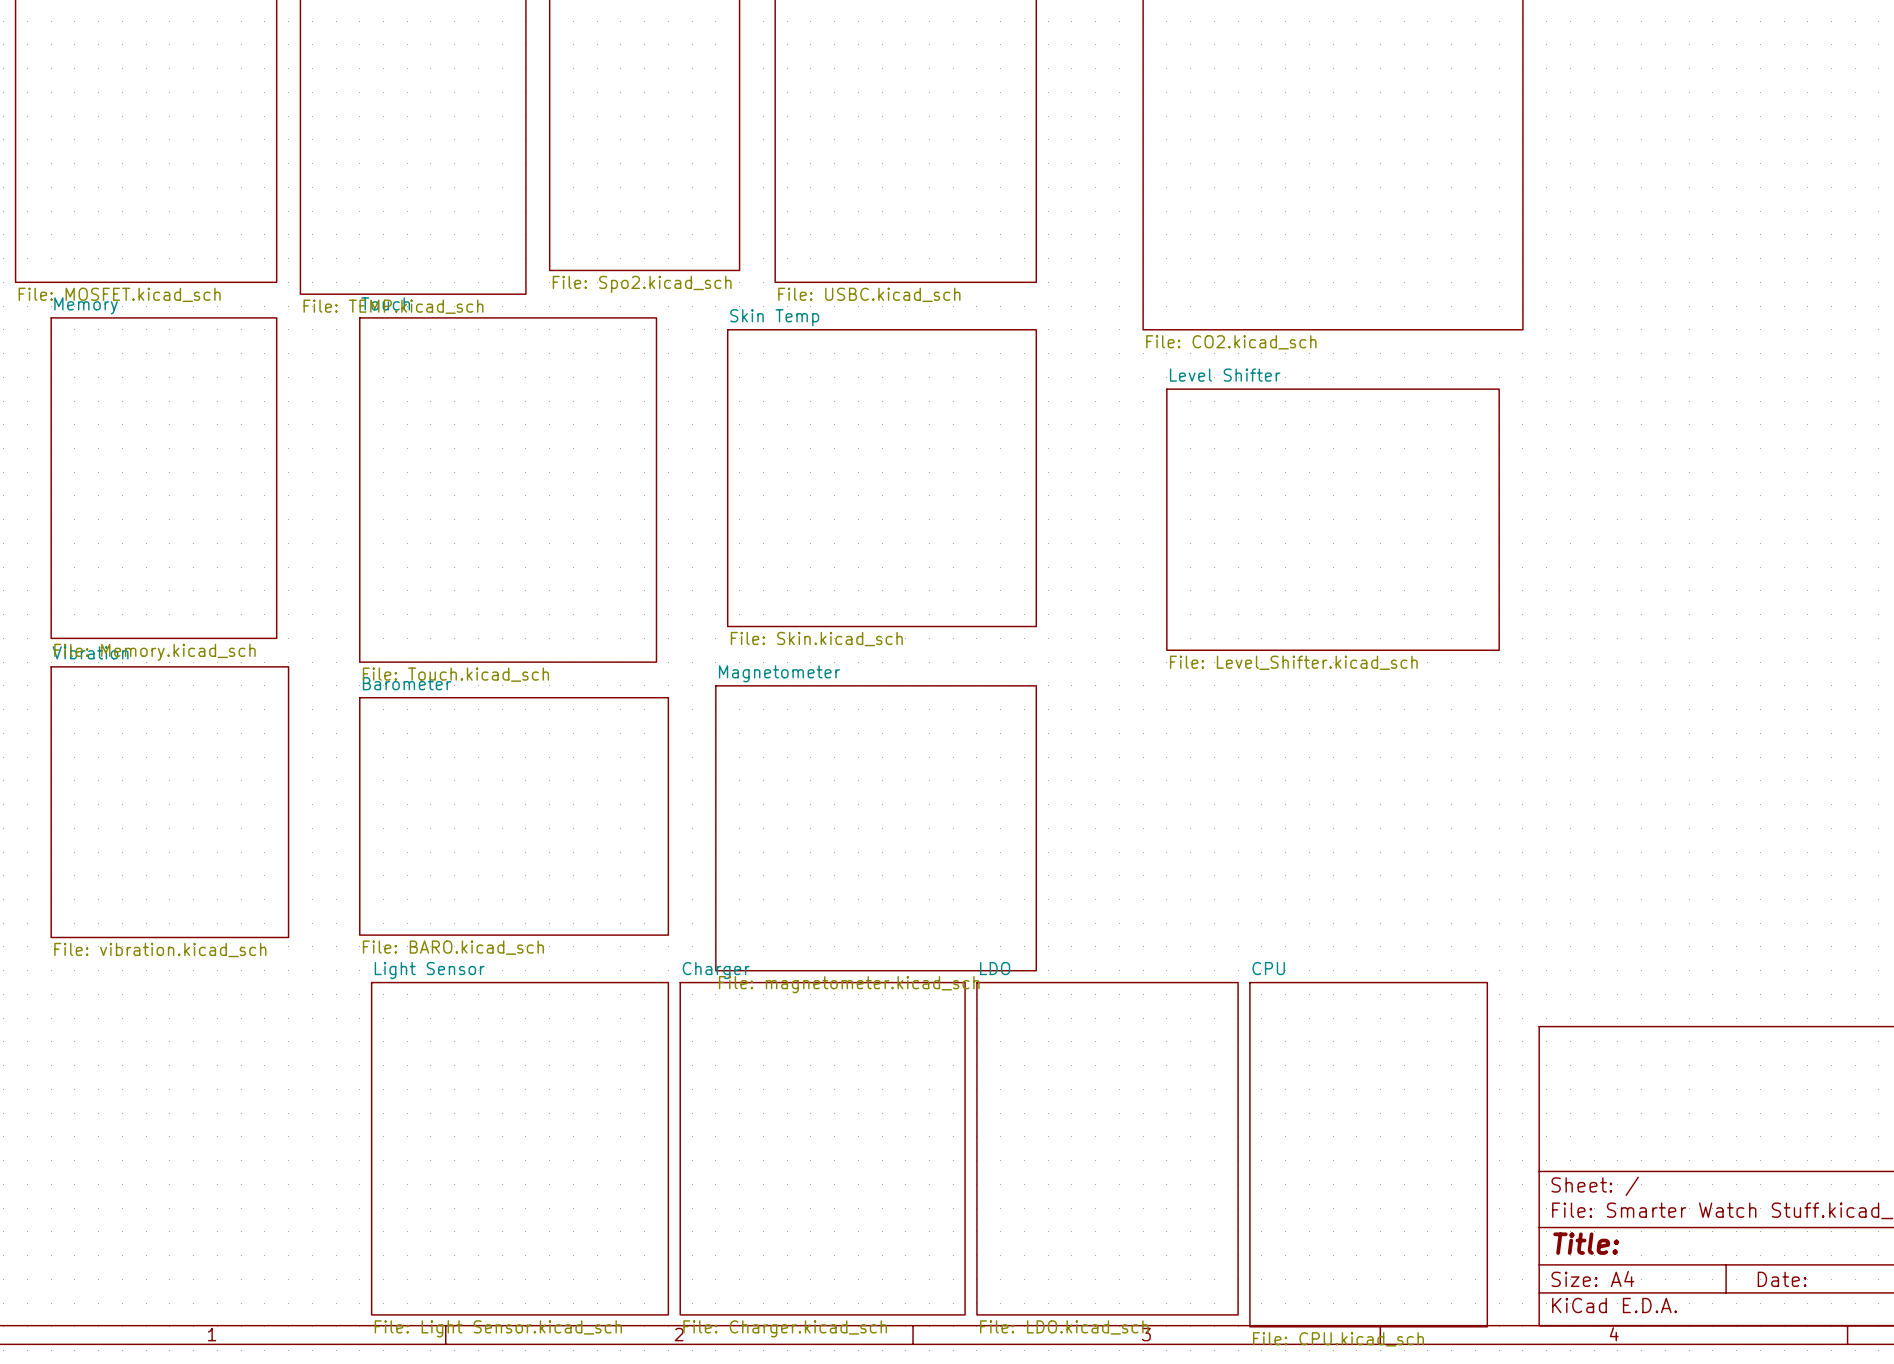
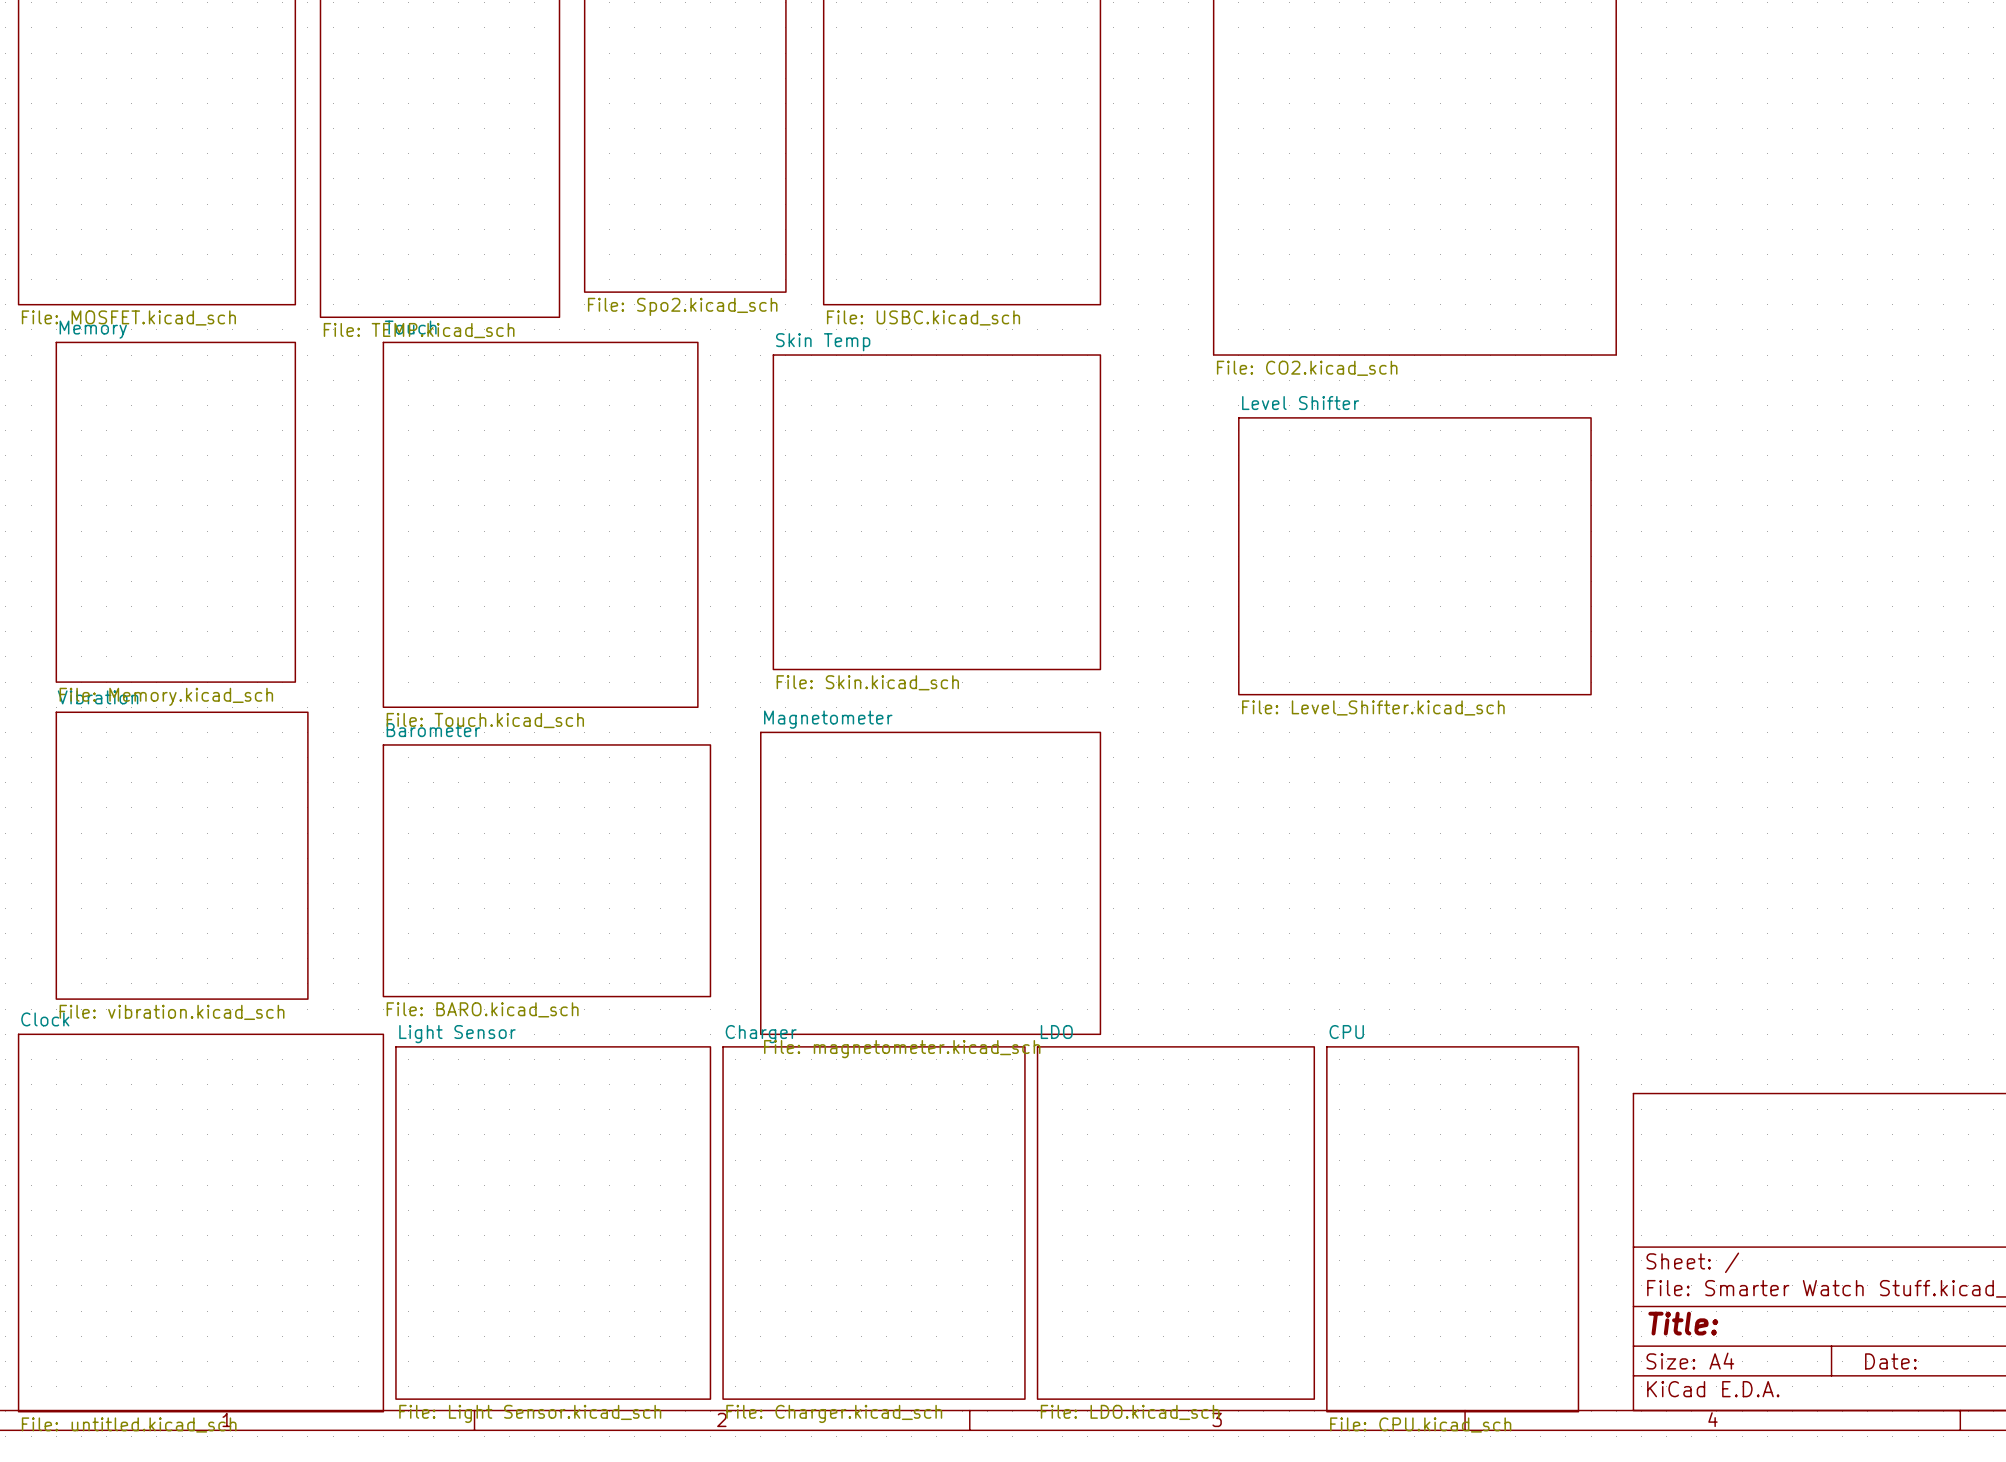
sheet Clock: none -> File: untitled.kicad_sch (200, 1223)

